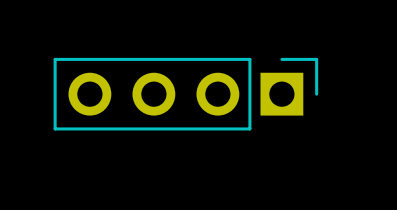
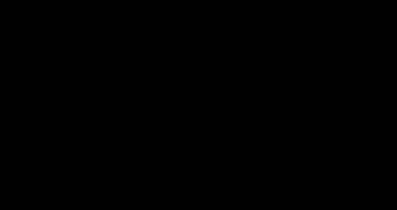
part: (185, 94) -> none

